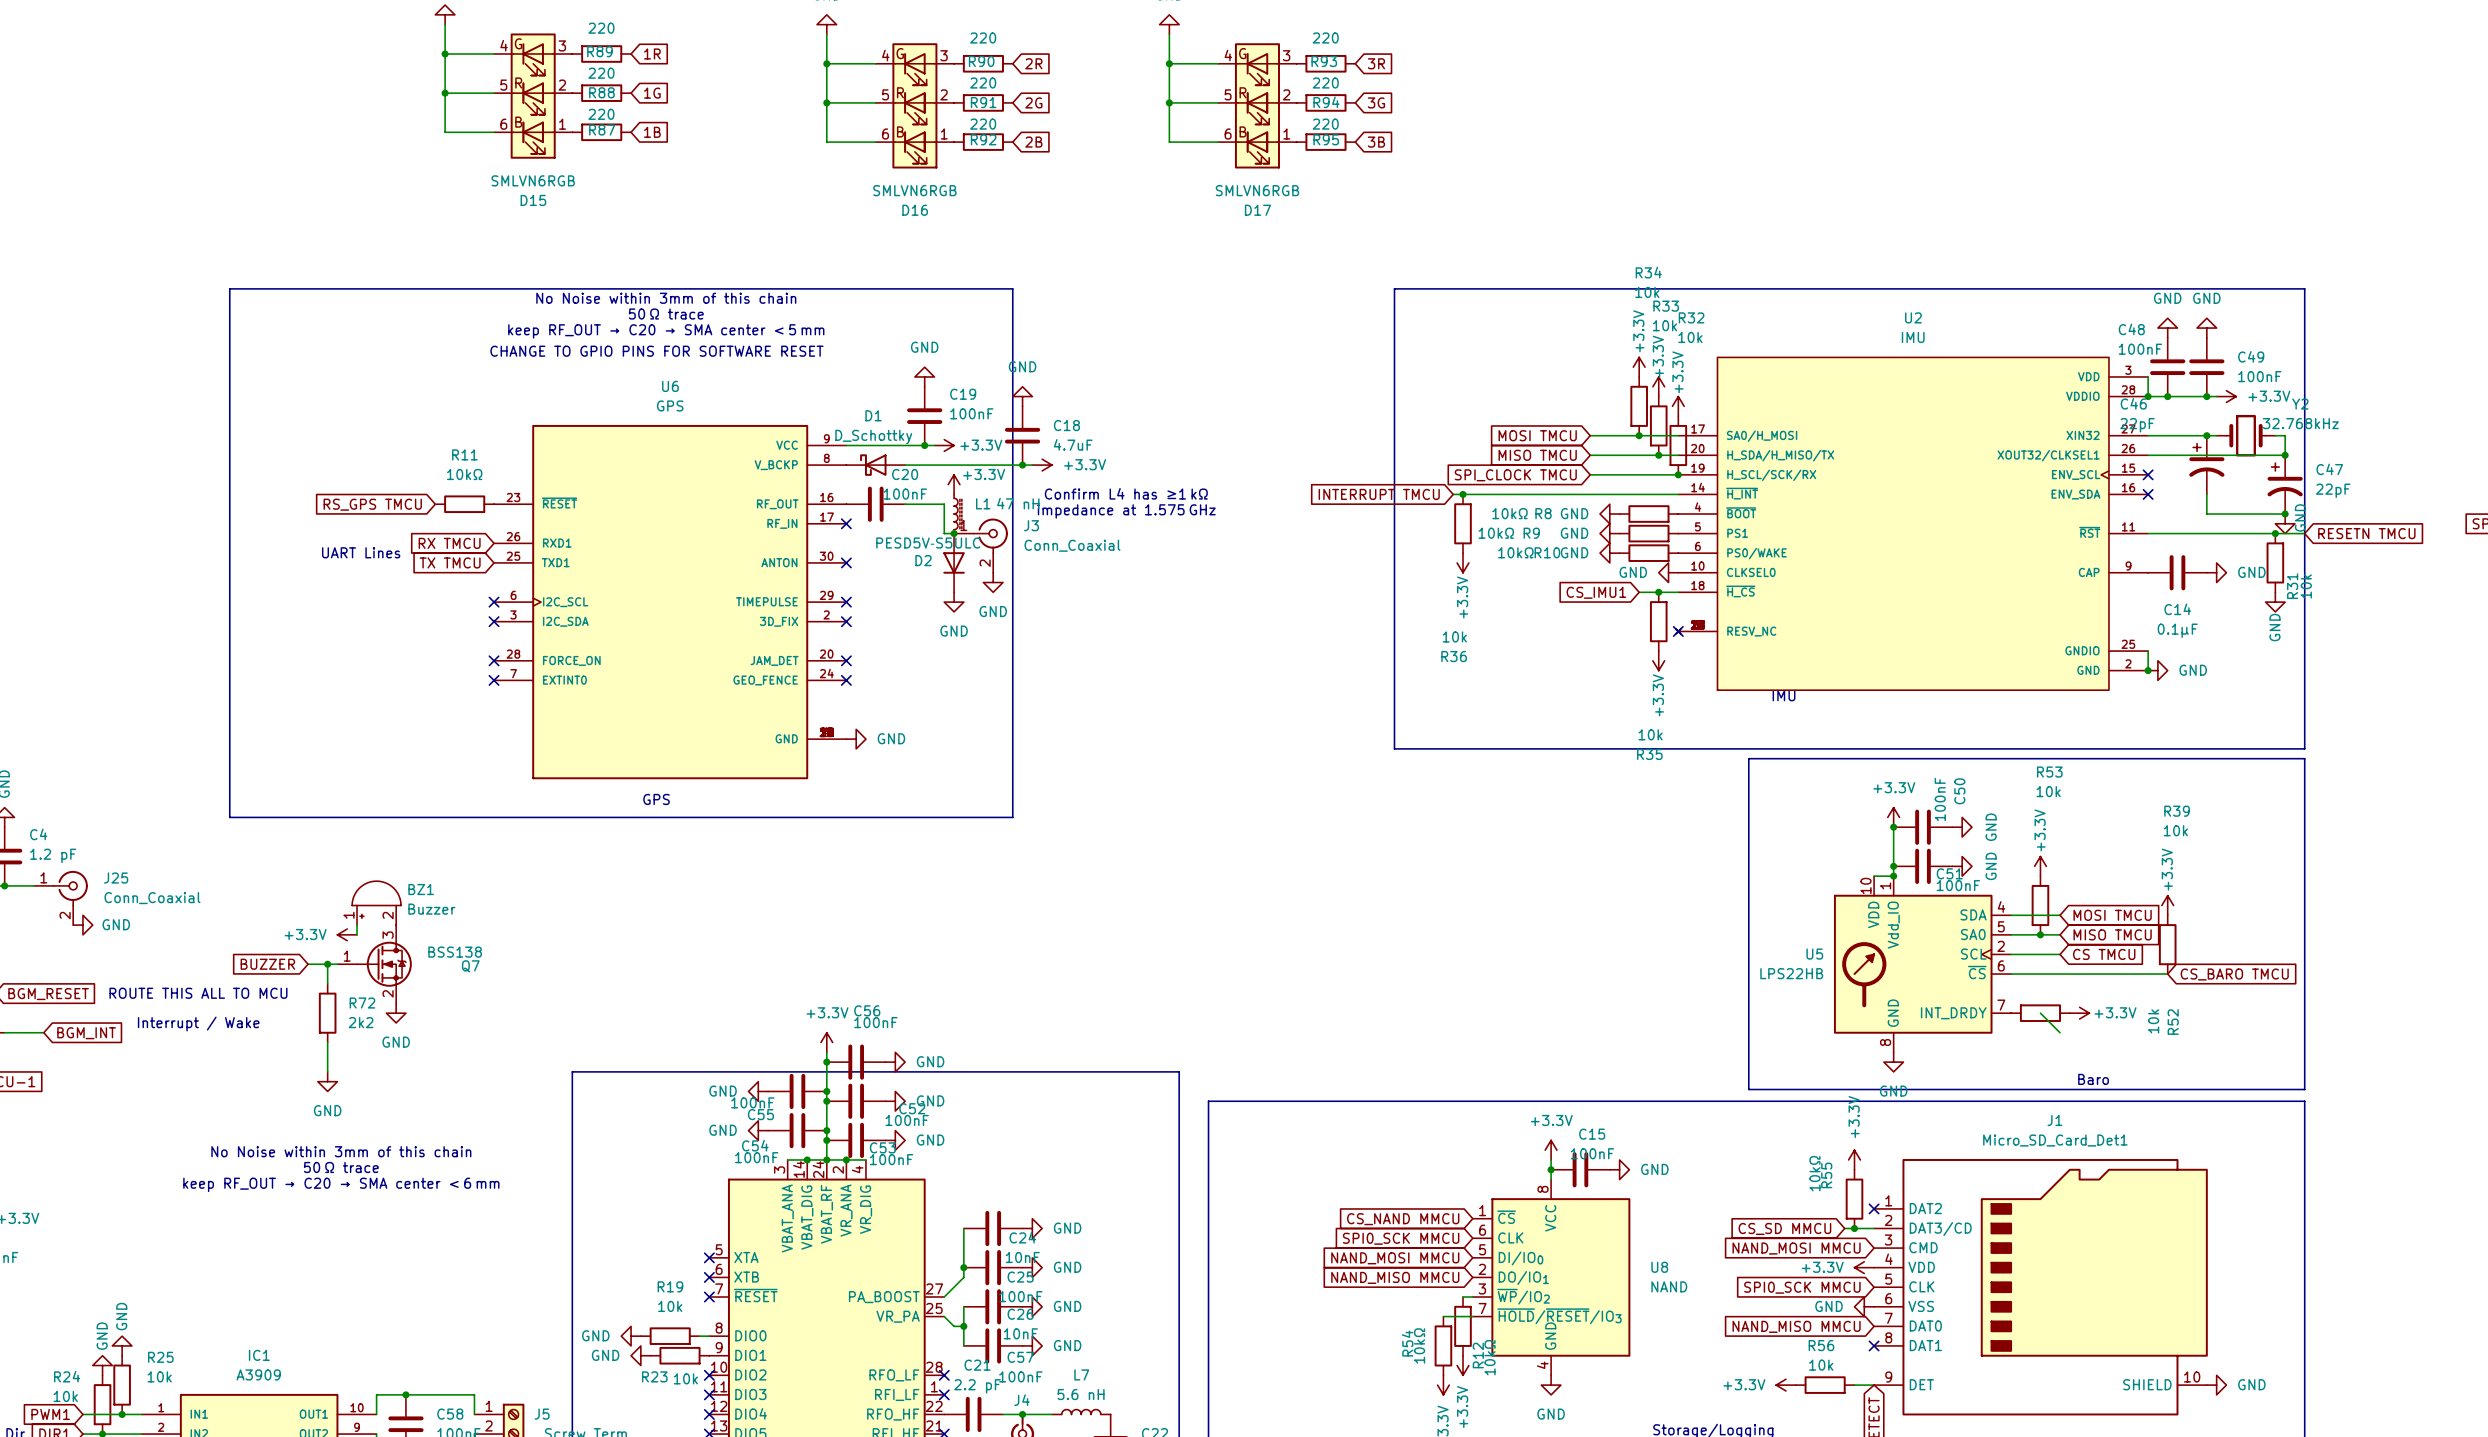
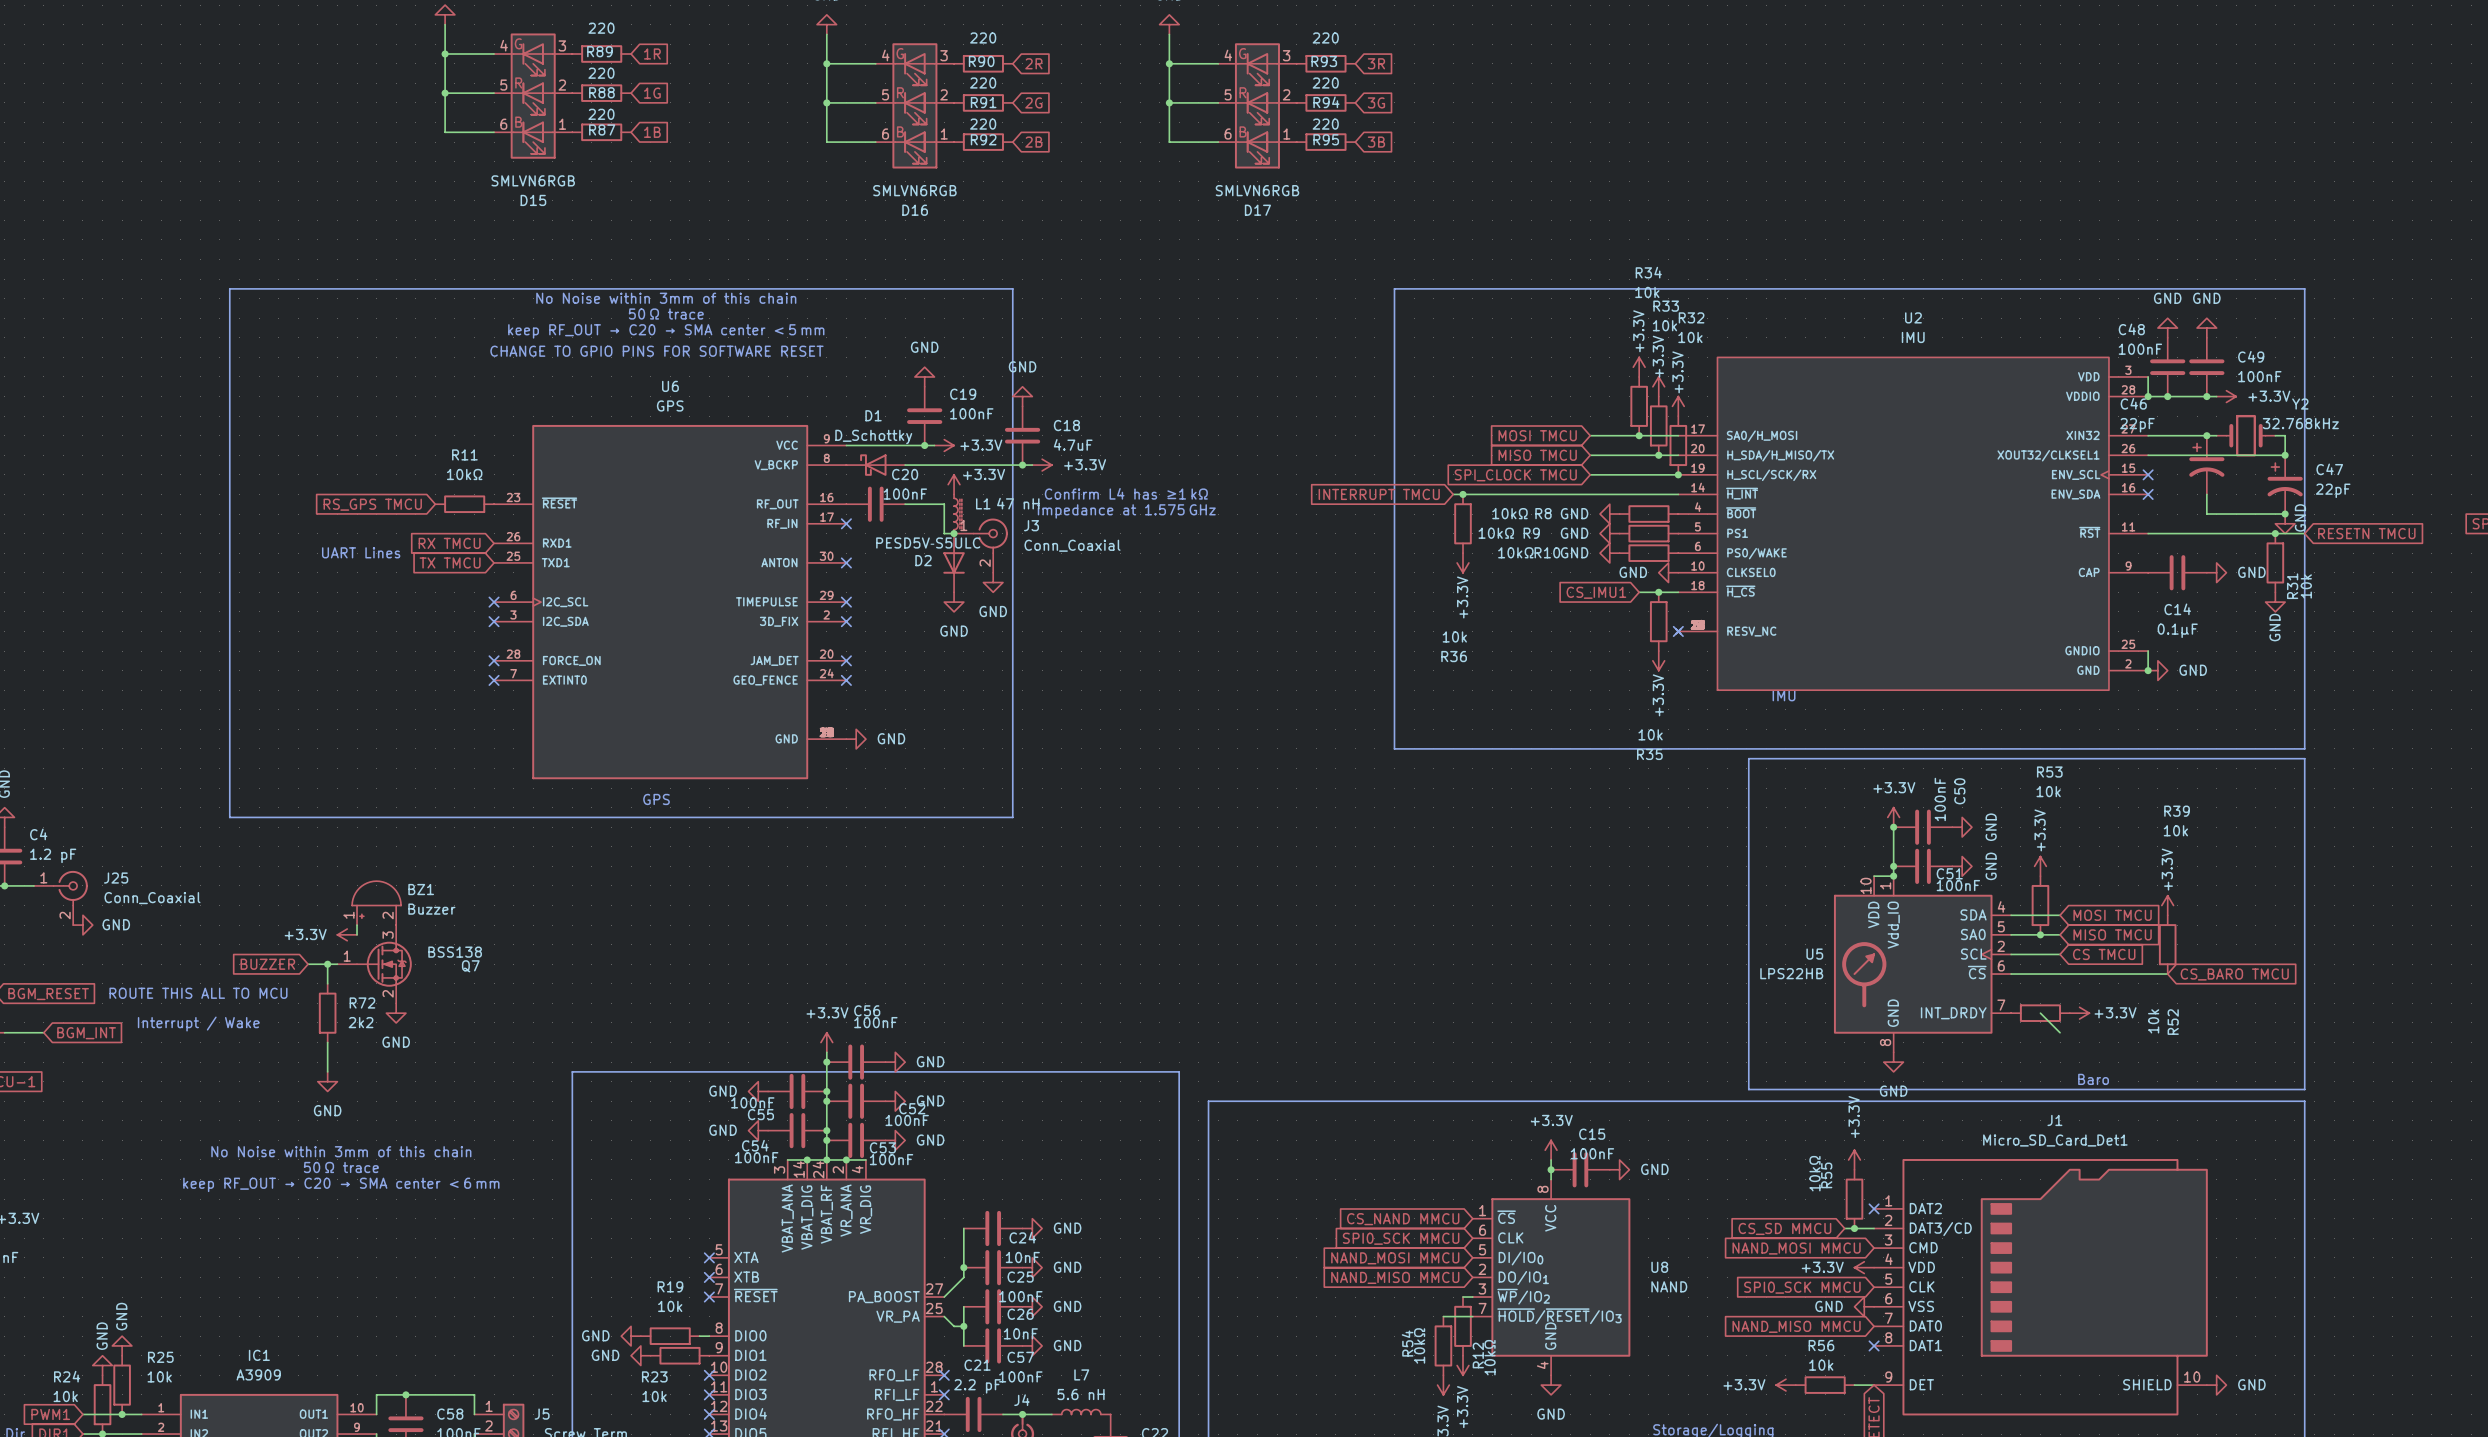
R23 value position: 10k (685, 1378) -> 10k (654, 1396)

